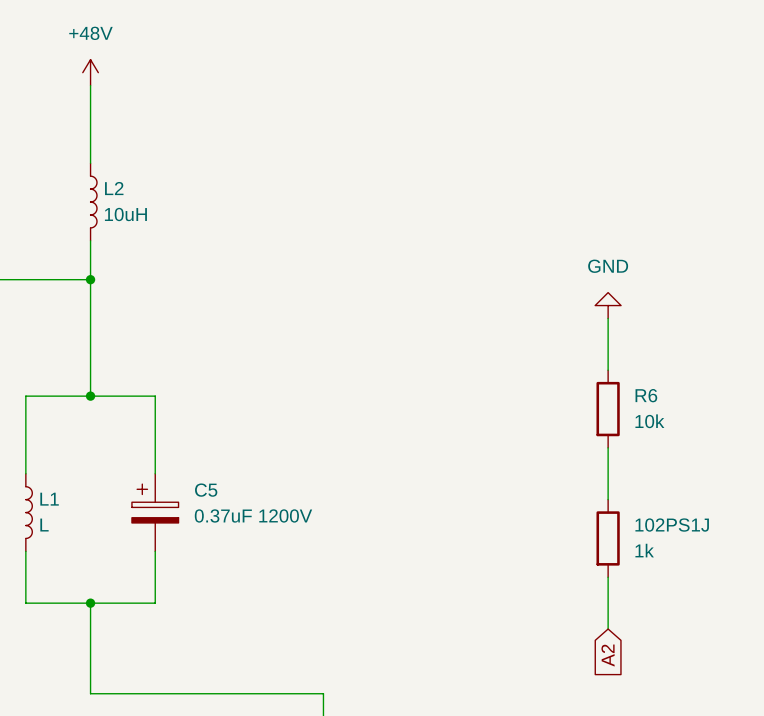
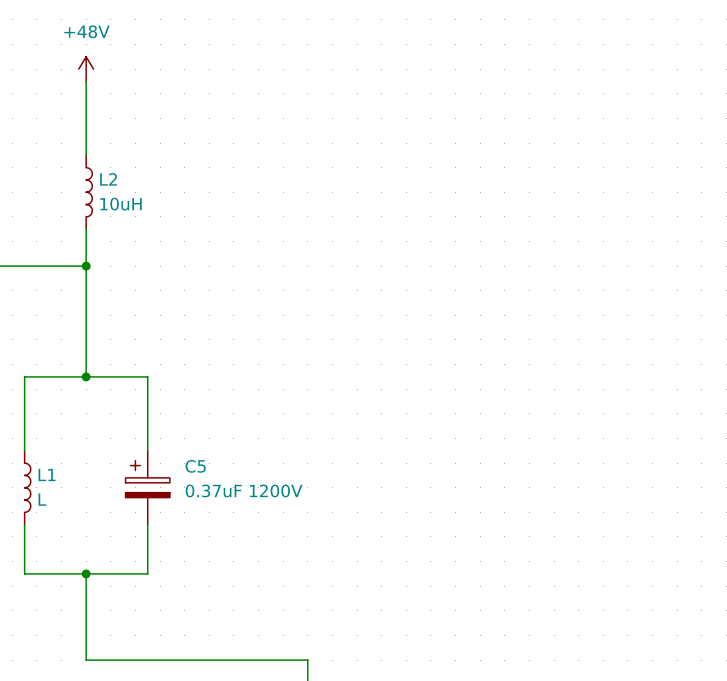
power symbol: GND (608, 305) -> none
wire: (608, 318) (608, 370) -> none
R6: 10k (608, 409) -> none
wire: (608, 447) (608, 499) -> none
102PS1J: 1k (608, 538) -> none
wire: (608, 577) (608, 629) -> none
global label: A2 (608, 655) -> none

